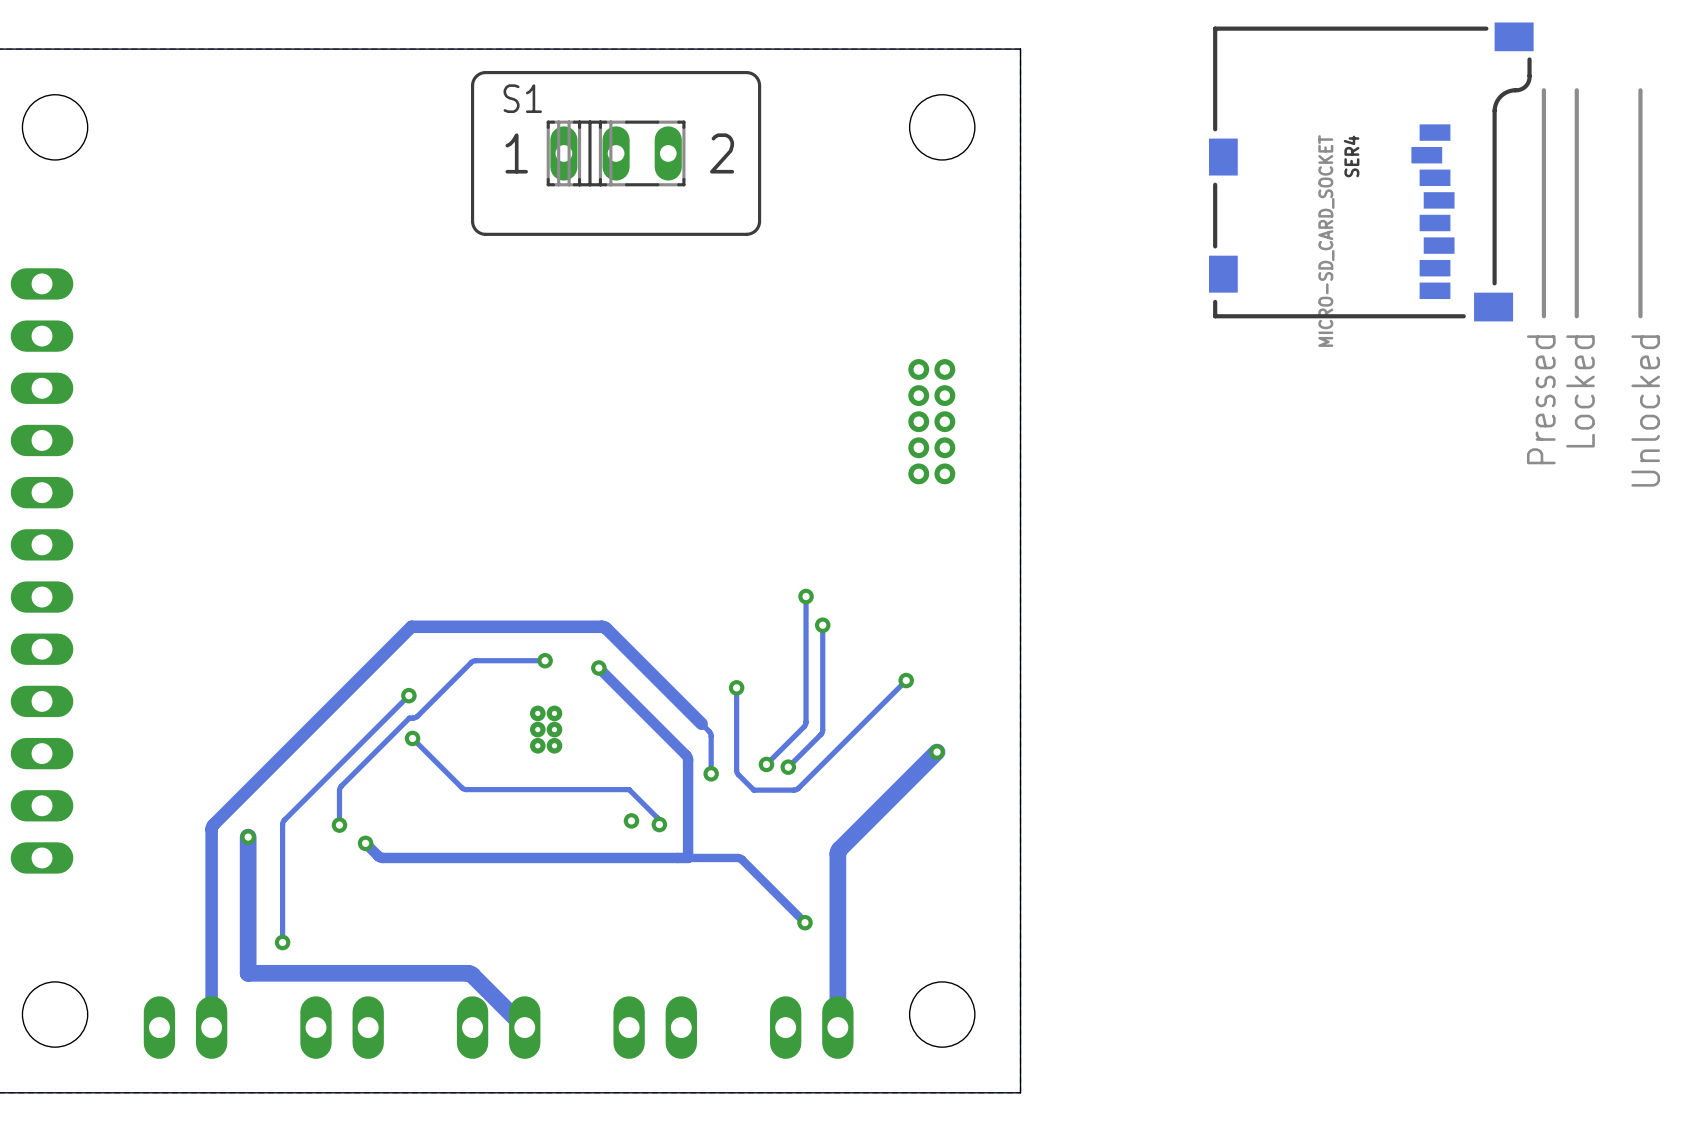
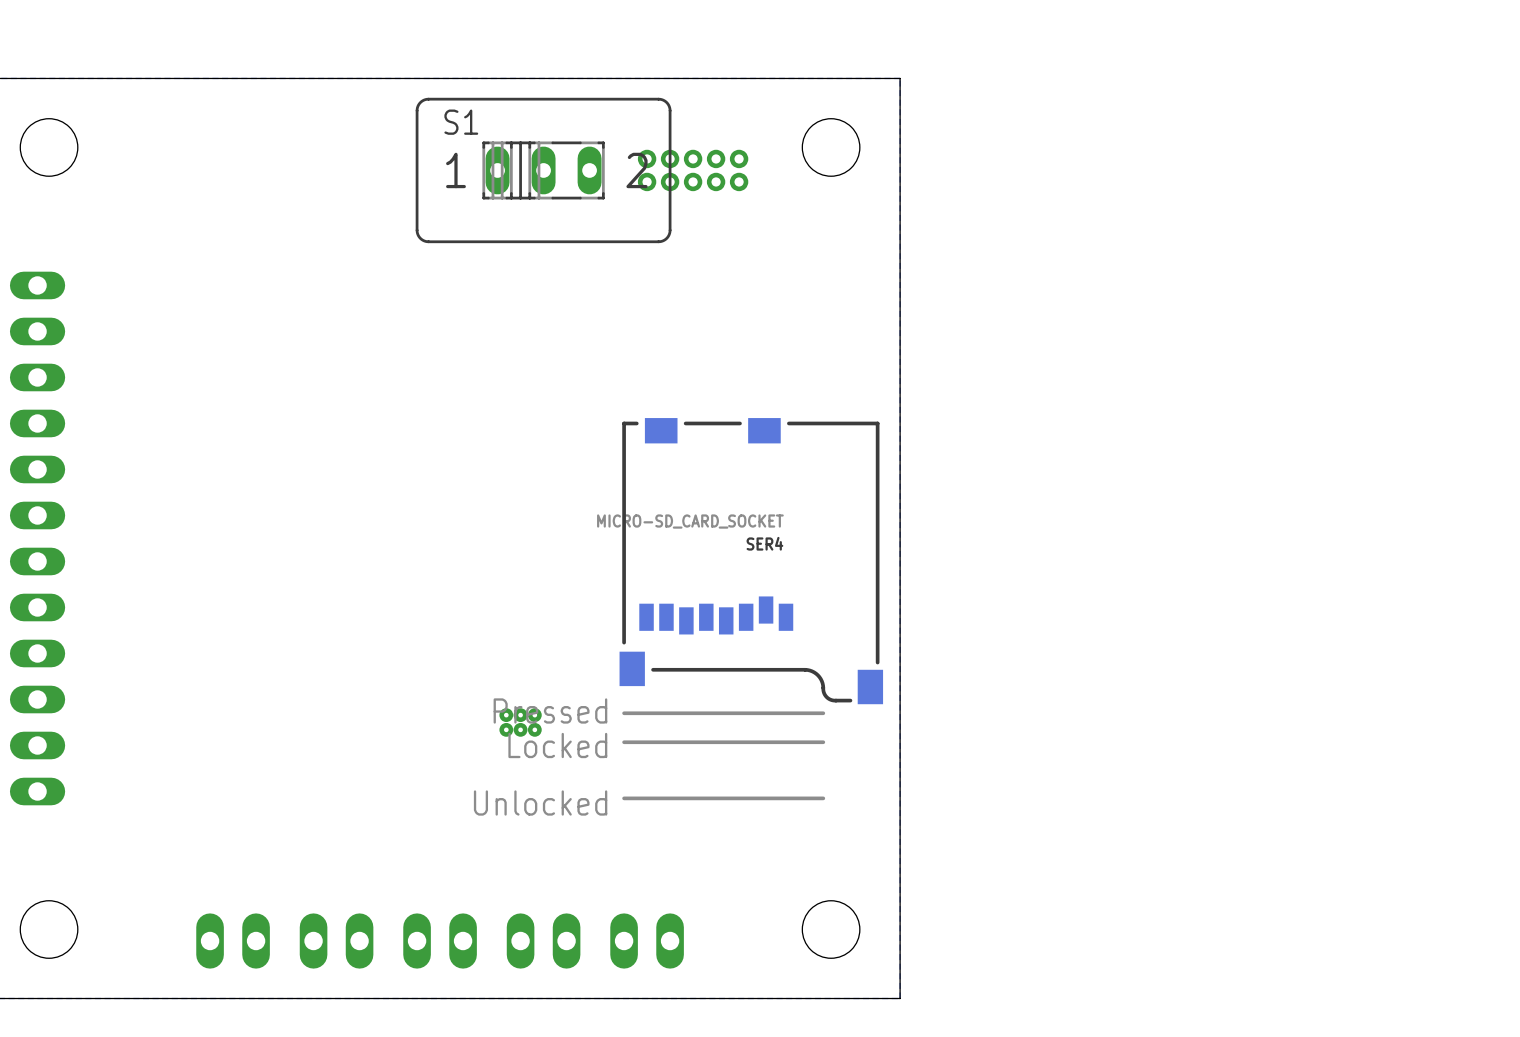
SER4 rotation: 0° (1425, 171) -> 90° clockwise (751, 609)
SER4 position: (1425, 171) -> (751, 609)
part rotation: 0° (931, 421) -> 90° clockwise (693, 170)
part position: (931, 421) -> (693, 170)
track: (806, 596) (805, 723) (766, 764) -> none
via: (806, 596) -> none
track: (822, 625) (822, 731) (788, 767) -> none
via: (822, 625) -> none
track: (545, 660) (471, 662) (417, 716) (409, 718) (340, 786) (339, 825) -> none
via: (545, 660) -> none
track: (598, 668) (687, 757) (688, 857) (382, 857) (378, 856) (365, 843) -> none
via: (598, 668) -> none
track: (906, 680) (798, 788) (793, 790) (753, 790) (737, 773) (736, 687) -> none
via: (906, 680) -> none
via: (736, 687) -> none
track: (408, 695) (283, 821) (282, 942) -> none
via: (408, 695) -> none
part rotation: 0° (546, 729) -> 90° clockwise (520, 722)
part position: (546, 729) -> (520, 722)
track: (412, 738) (463, 789) (629, 789) (658, 818) (659, 824) -> none
via: (412, 738) -> none
track: (937, 752) (838, 851) (837, 1027) -> none
via: (937, 752) -> none
via: (766, 764) -> none
via: (788, 767) -> none
track: (711, 773) (709, 732) (604, 627) (411, 626) (212, 826) (211, 1027) -> none
via: (711, 773) -> none
via: (631, 820) -> none
via: (659, 824) -> none
via: (339, 825) -> none
track: (248, 837) (248, 973) (468, 973) (524, 1027) -> none
via: (248, 837) -> none
via: (365, 843) -> none
track: (677, 857) (740, 858) (804, 922) -> none
via: (804, 922) -> none
via: (282, 942) -> none
part: (185, 1027) -> none
part: none -> (233, 941)
part: (342, 1027) -> none
part: none -> (336, 941)
part: none -> (543, 941)
part: (655, 1027) -> none
part: none -> (647, 941)
part: (811, 1027) -> none

